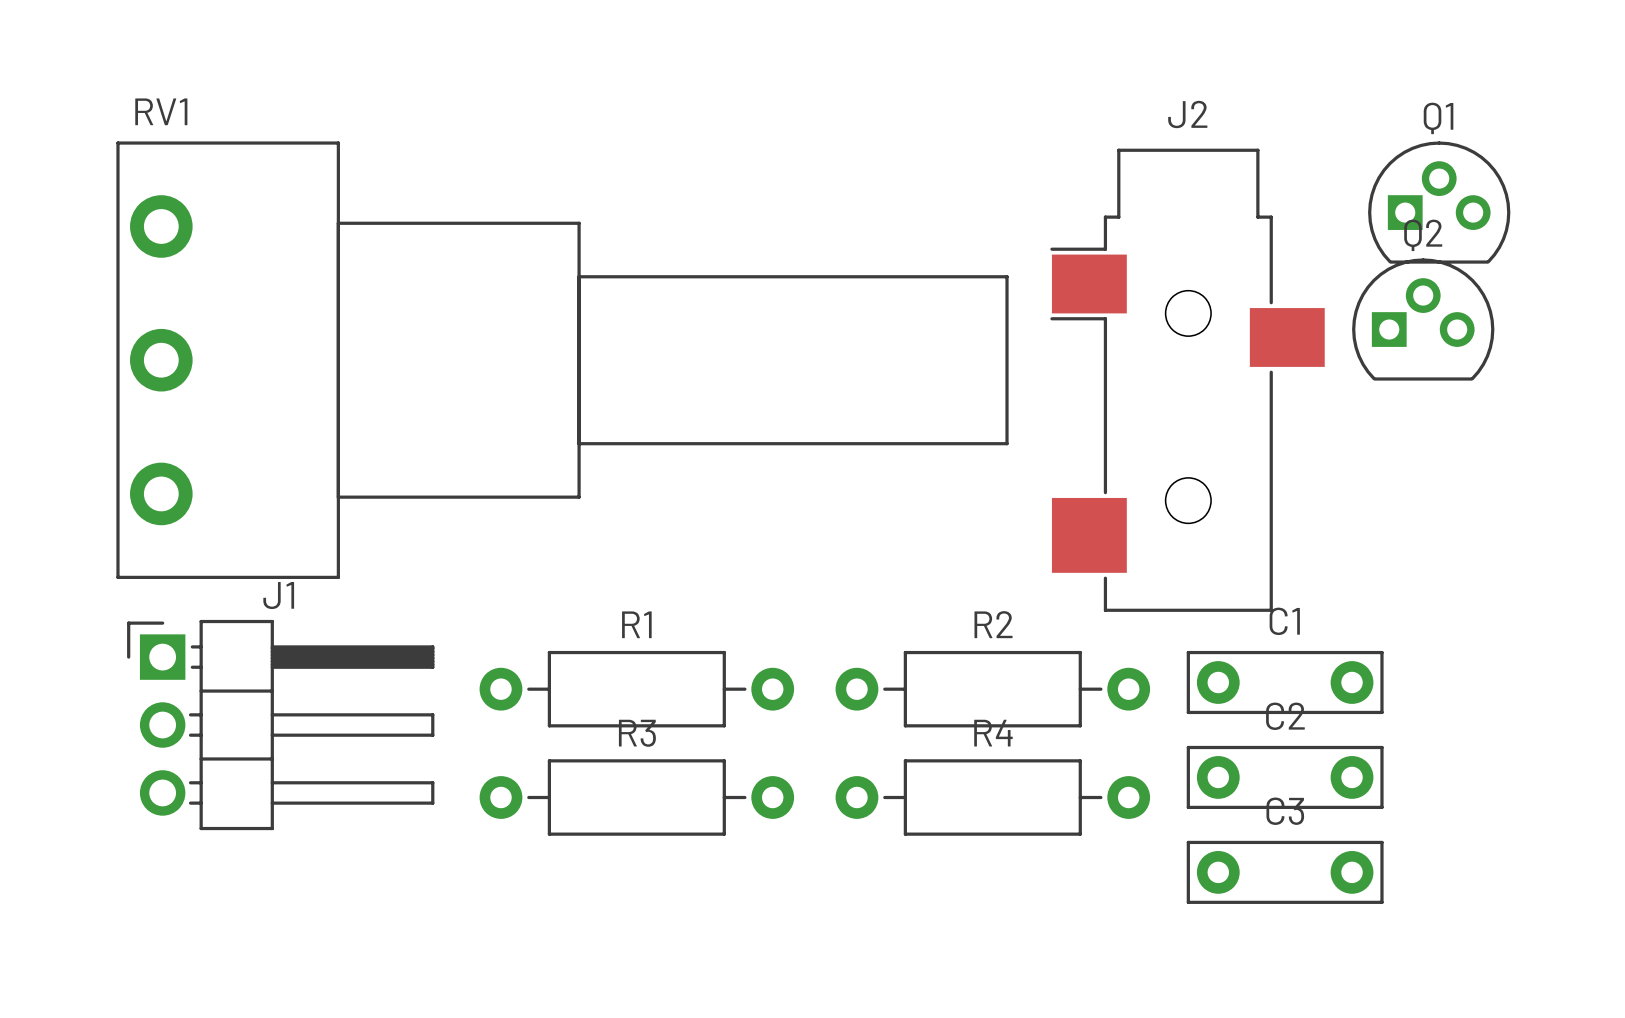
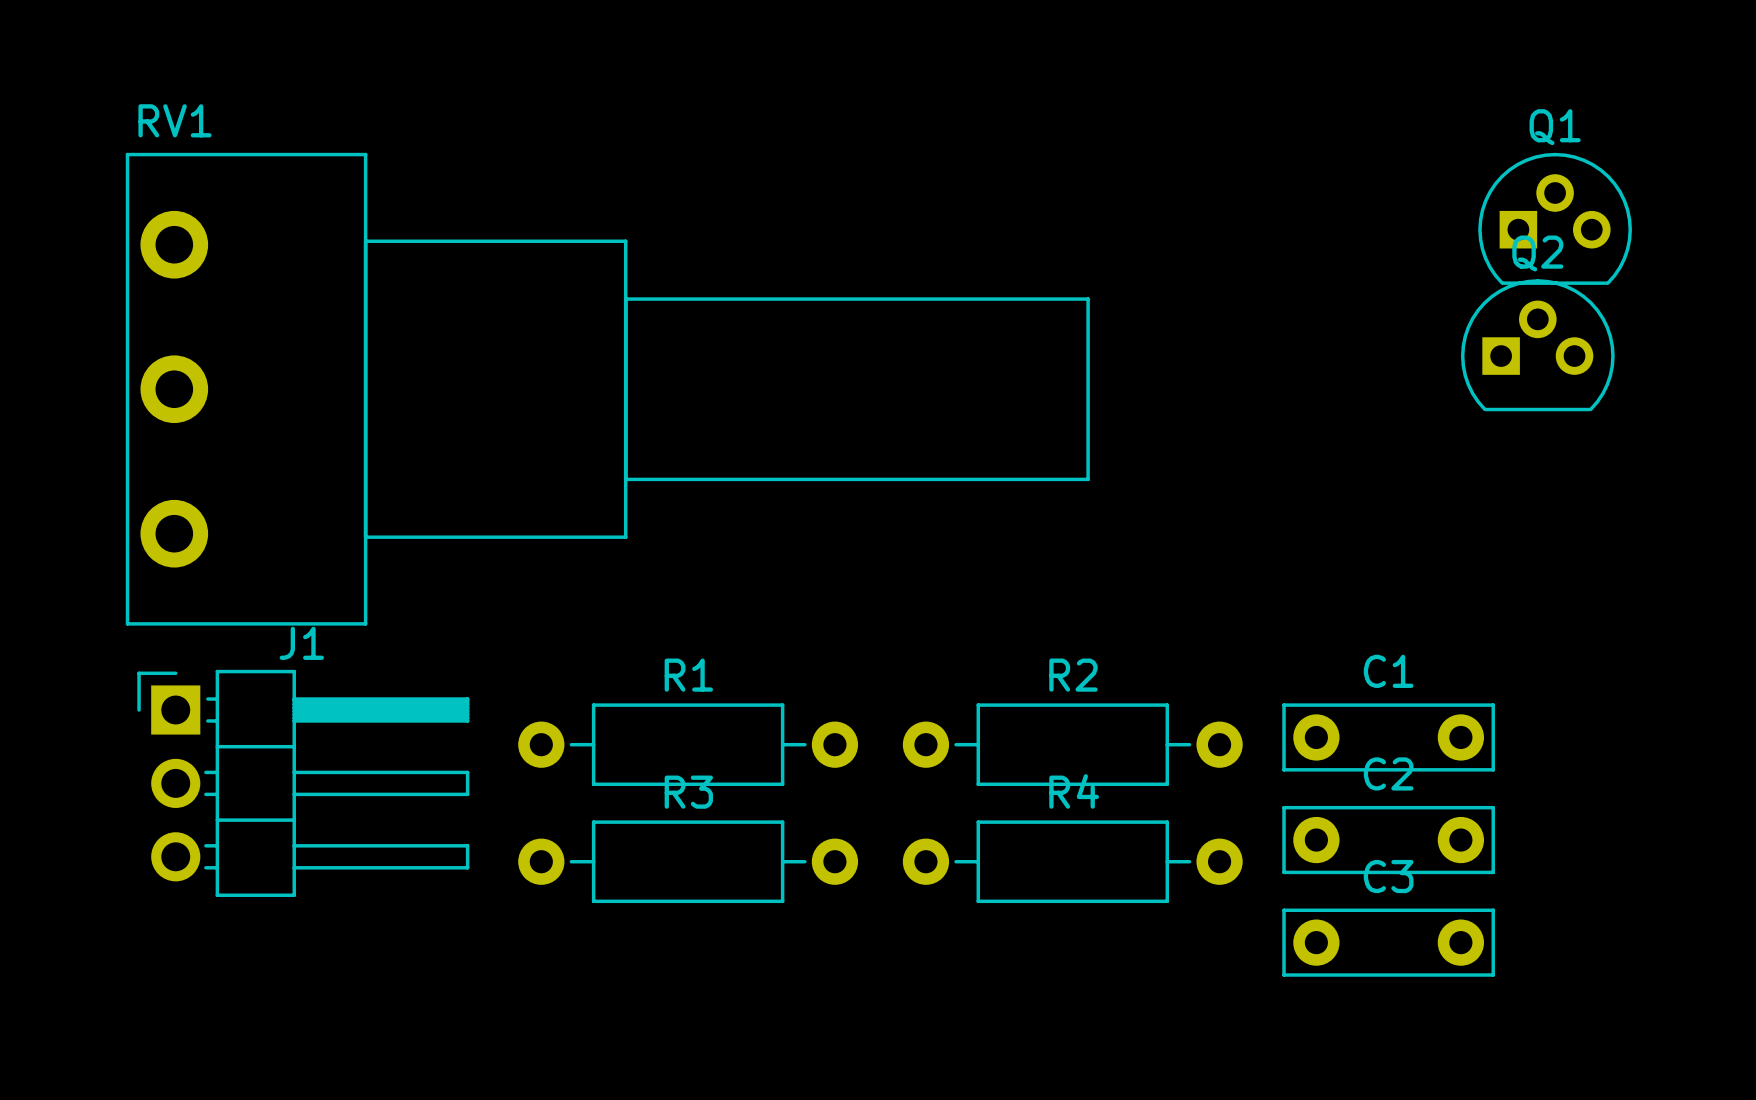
J2: (1187, 380) -> none

